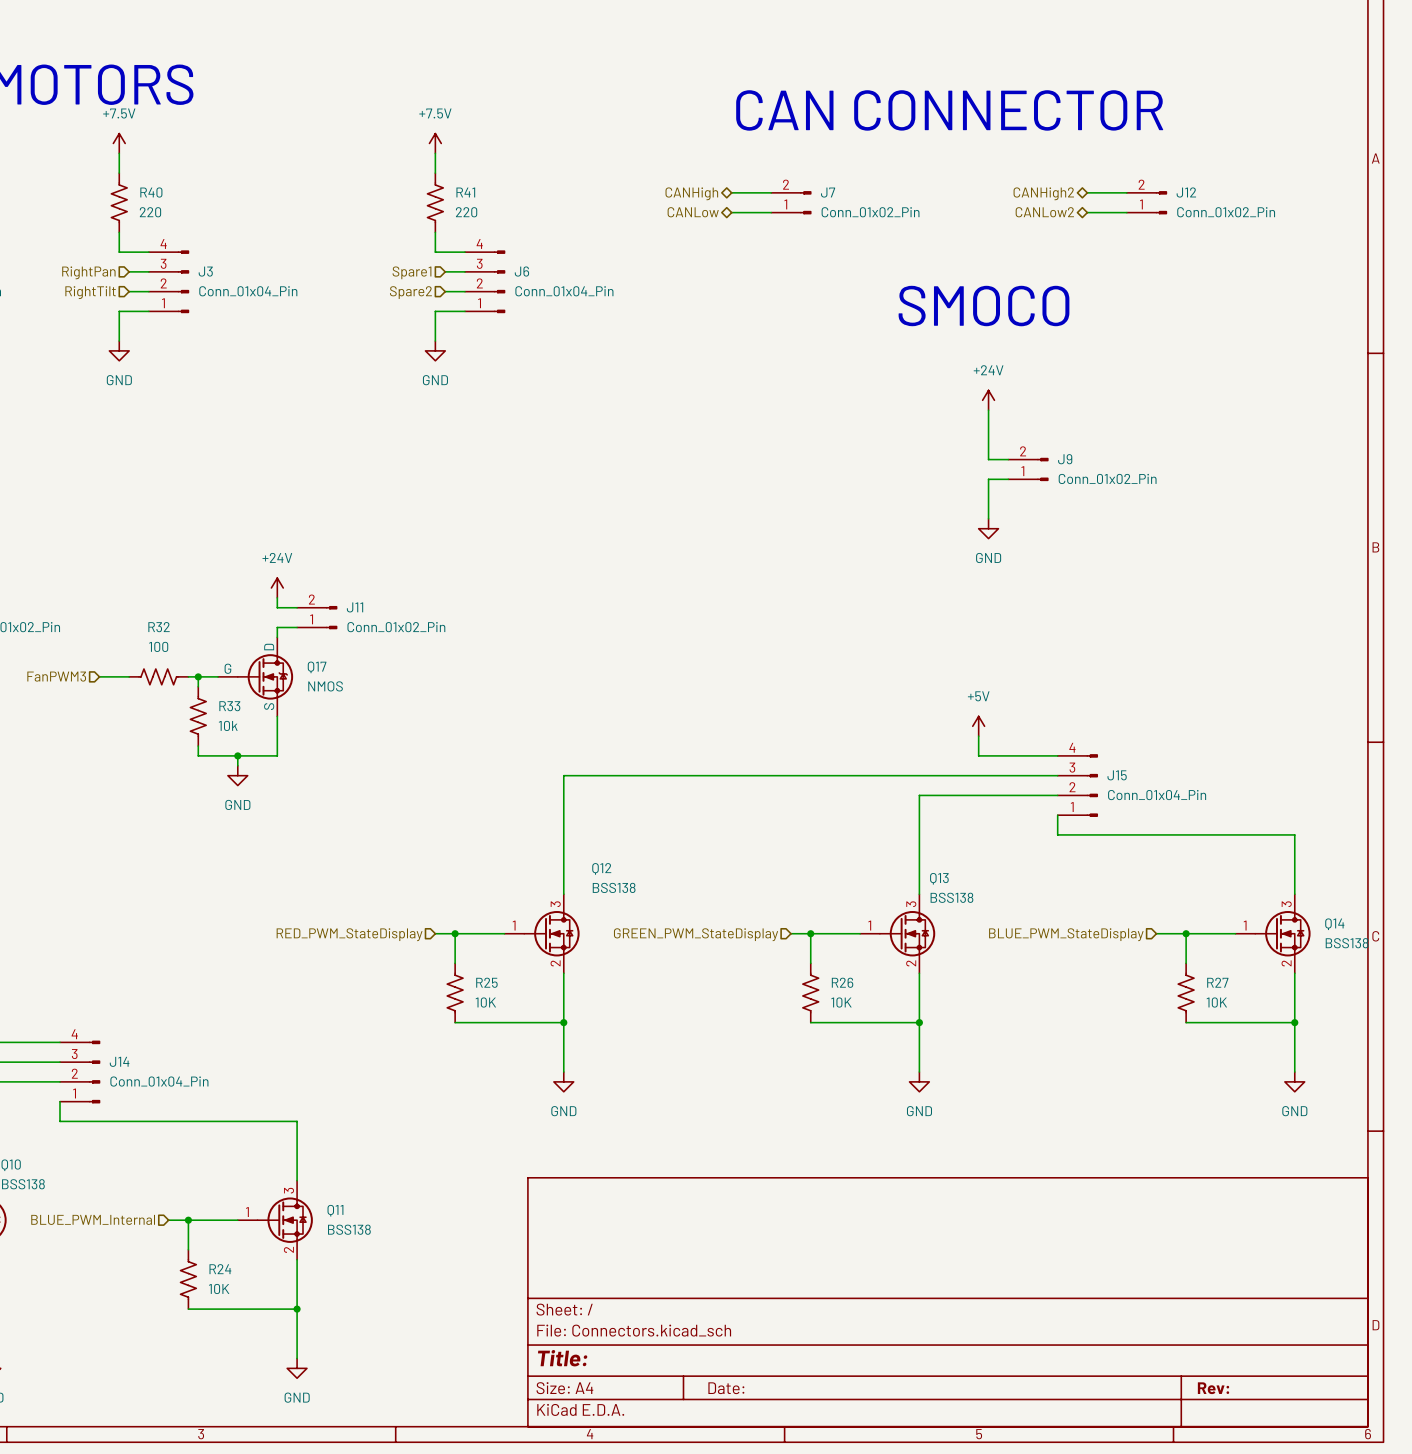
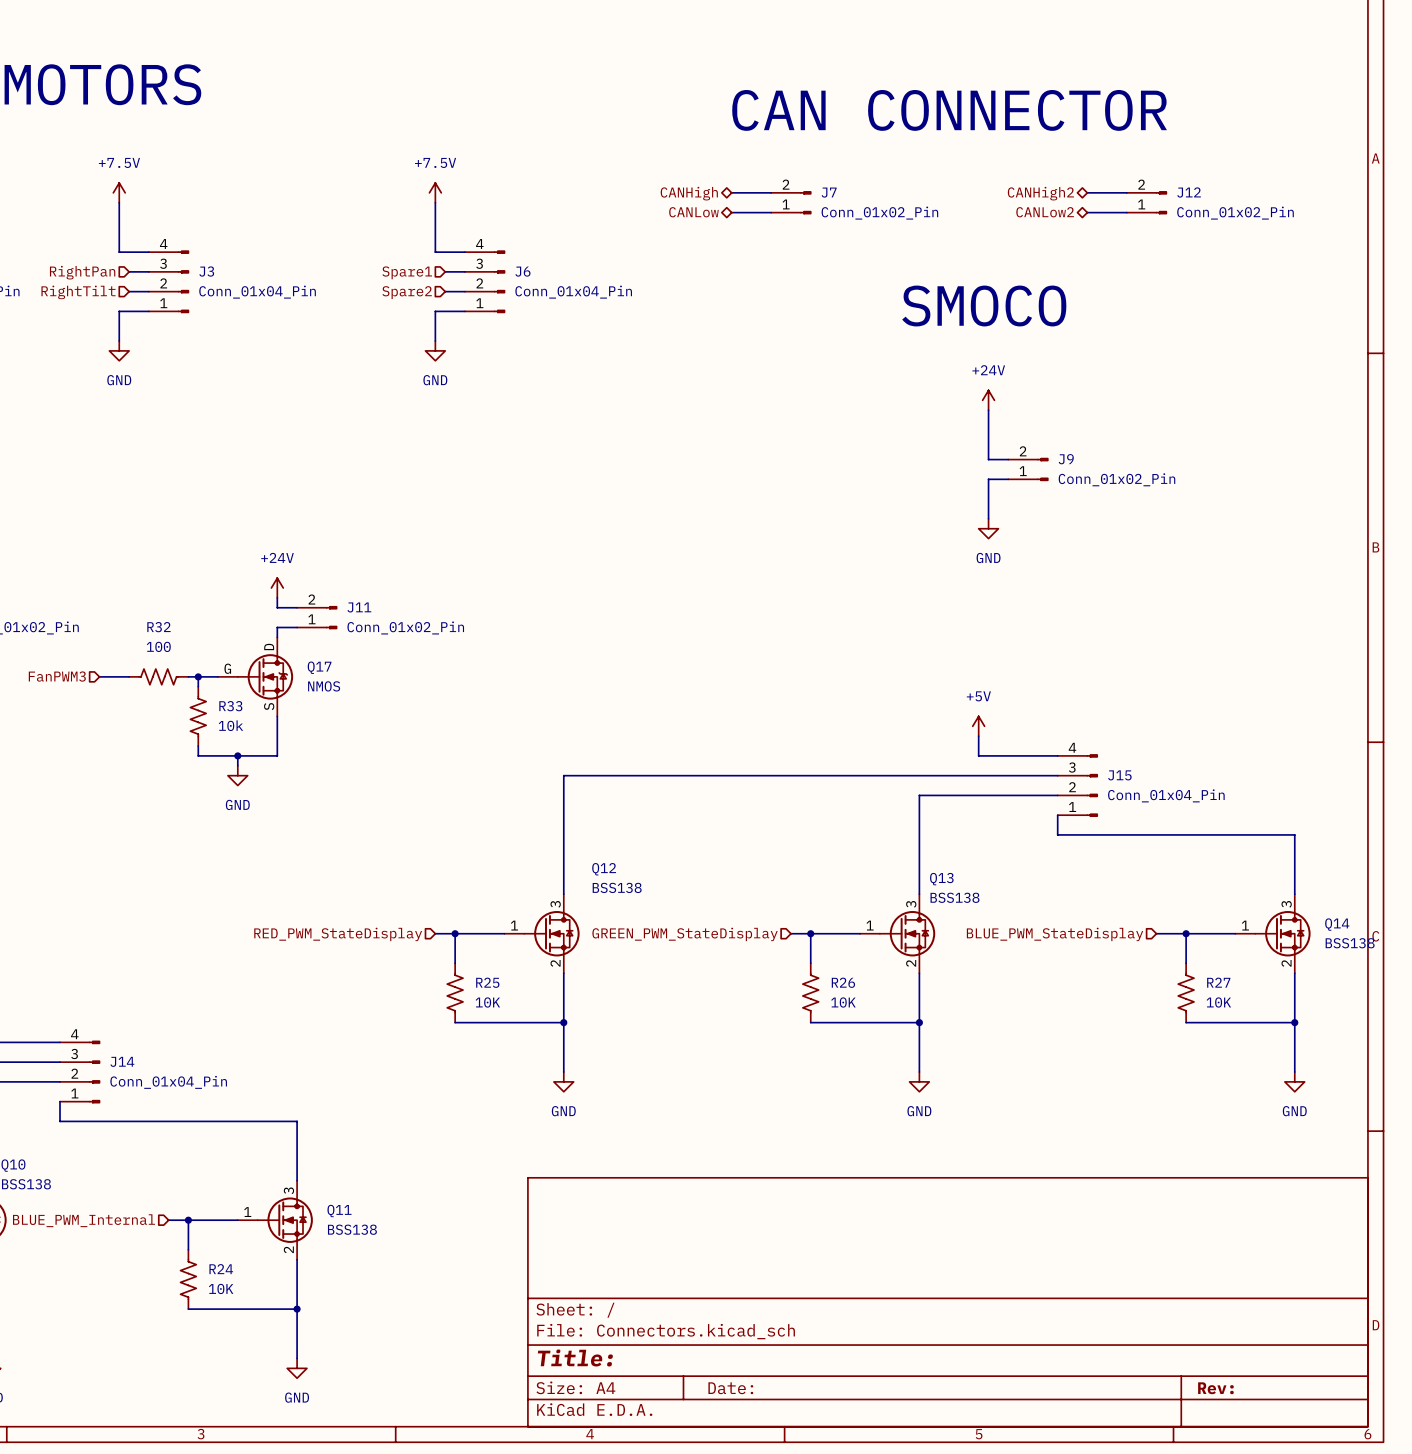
power symbol position: +7.5V (119, 143) -> +7.5V (119, 192)
power symbol position: +7.5V (435, 143) -> +7.5V (435, 192)
wire: (119, 153) (119, 173) -> none
wire: (435, 153) (435, 173) -> none
R40: 220 (119, 202) -> none
R41: 220 (435, 202) -> none

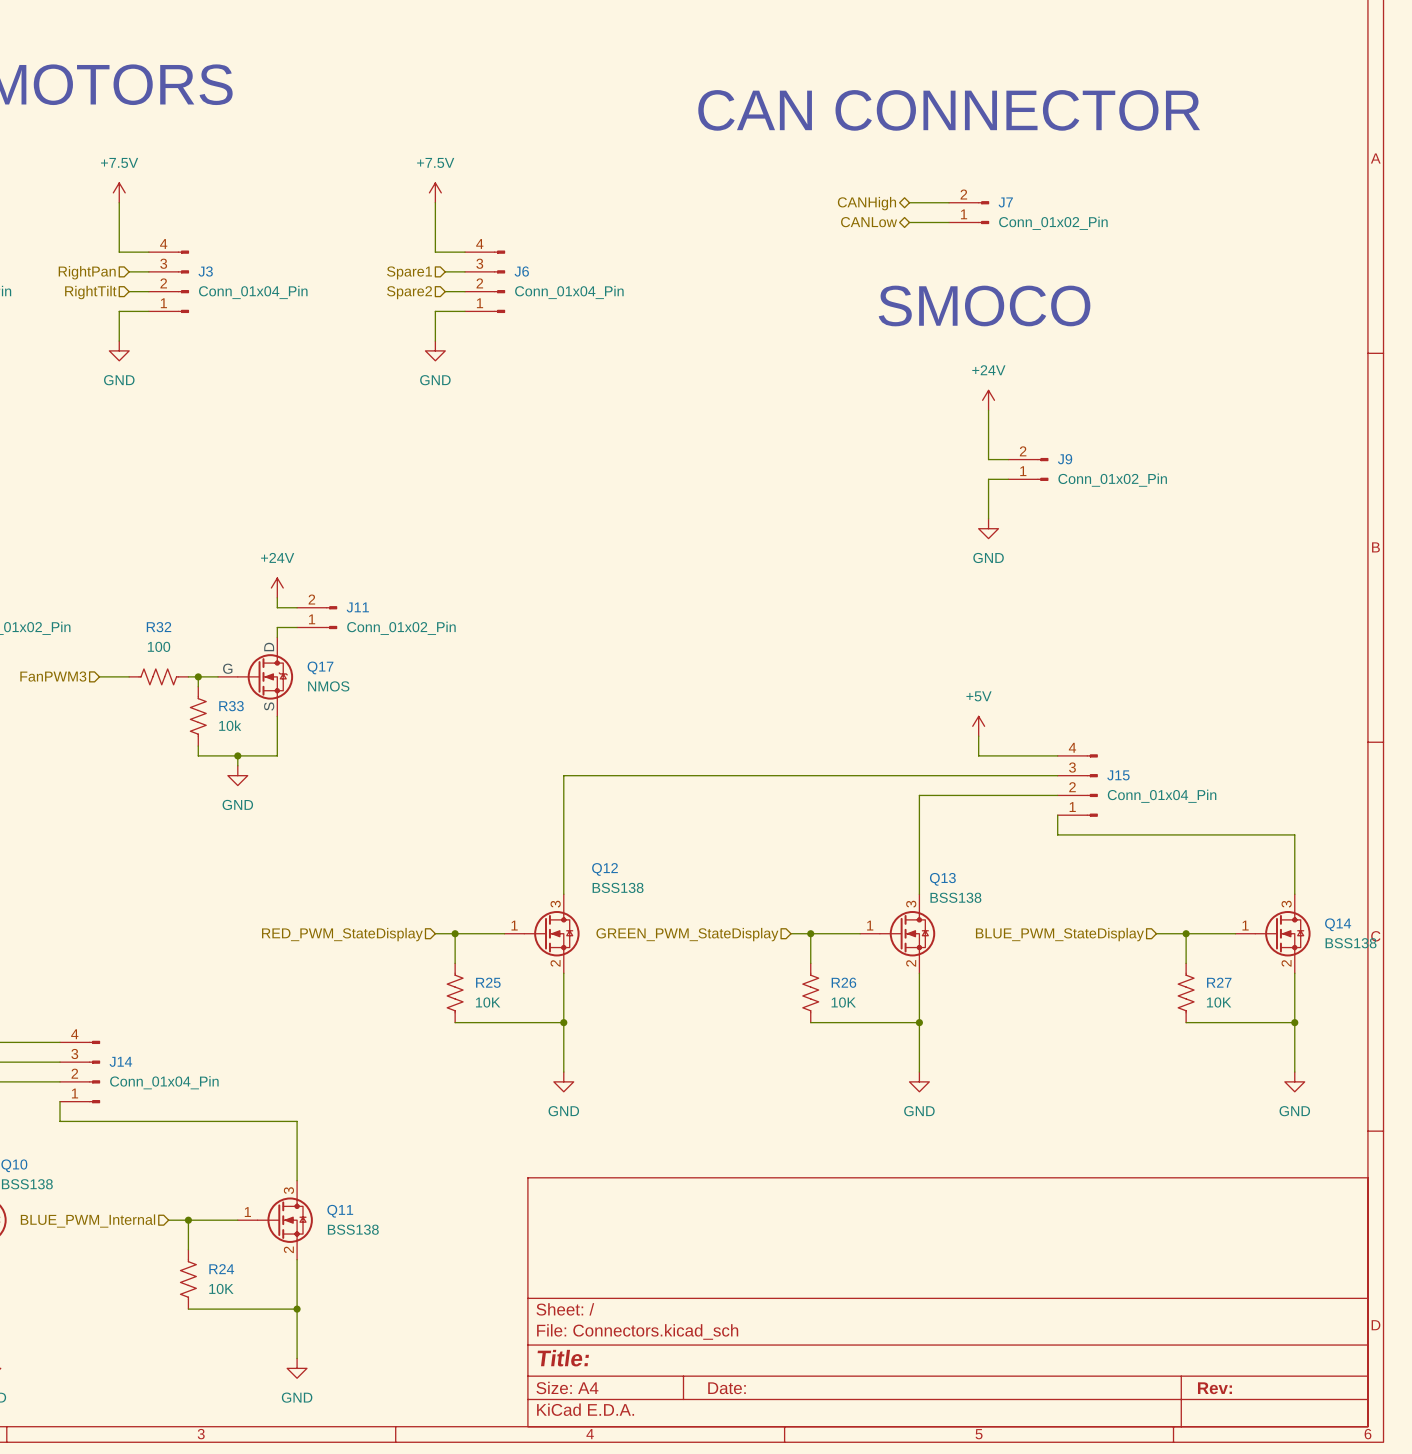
wire: (731, 192) (771, 192) -> (909, 202) (949, 202)
wire: (1087, 192) (1126, 192) -> none
hierarchical label position: CANHigh (689, 193) -> CANHigh (866, 203)
hierarchical label: CANHigh2 (1040, 193) -> none
J7 position: (791, 202) -> (969, 212)
J12: Conn_01x02_Pin (1146, 202) -> none
hierarchical label position: CANLow (693, 212) -> CANLow (869, 222)
wire: (731, 212) (771, 212) -> (909, 222) (949, 222)
hierarchical label: CANLow2 (1045, 212) -> none
wire: (1087, 212) (1126, 212) -> none

